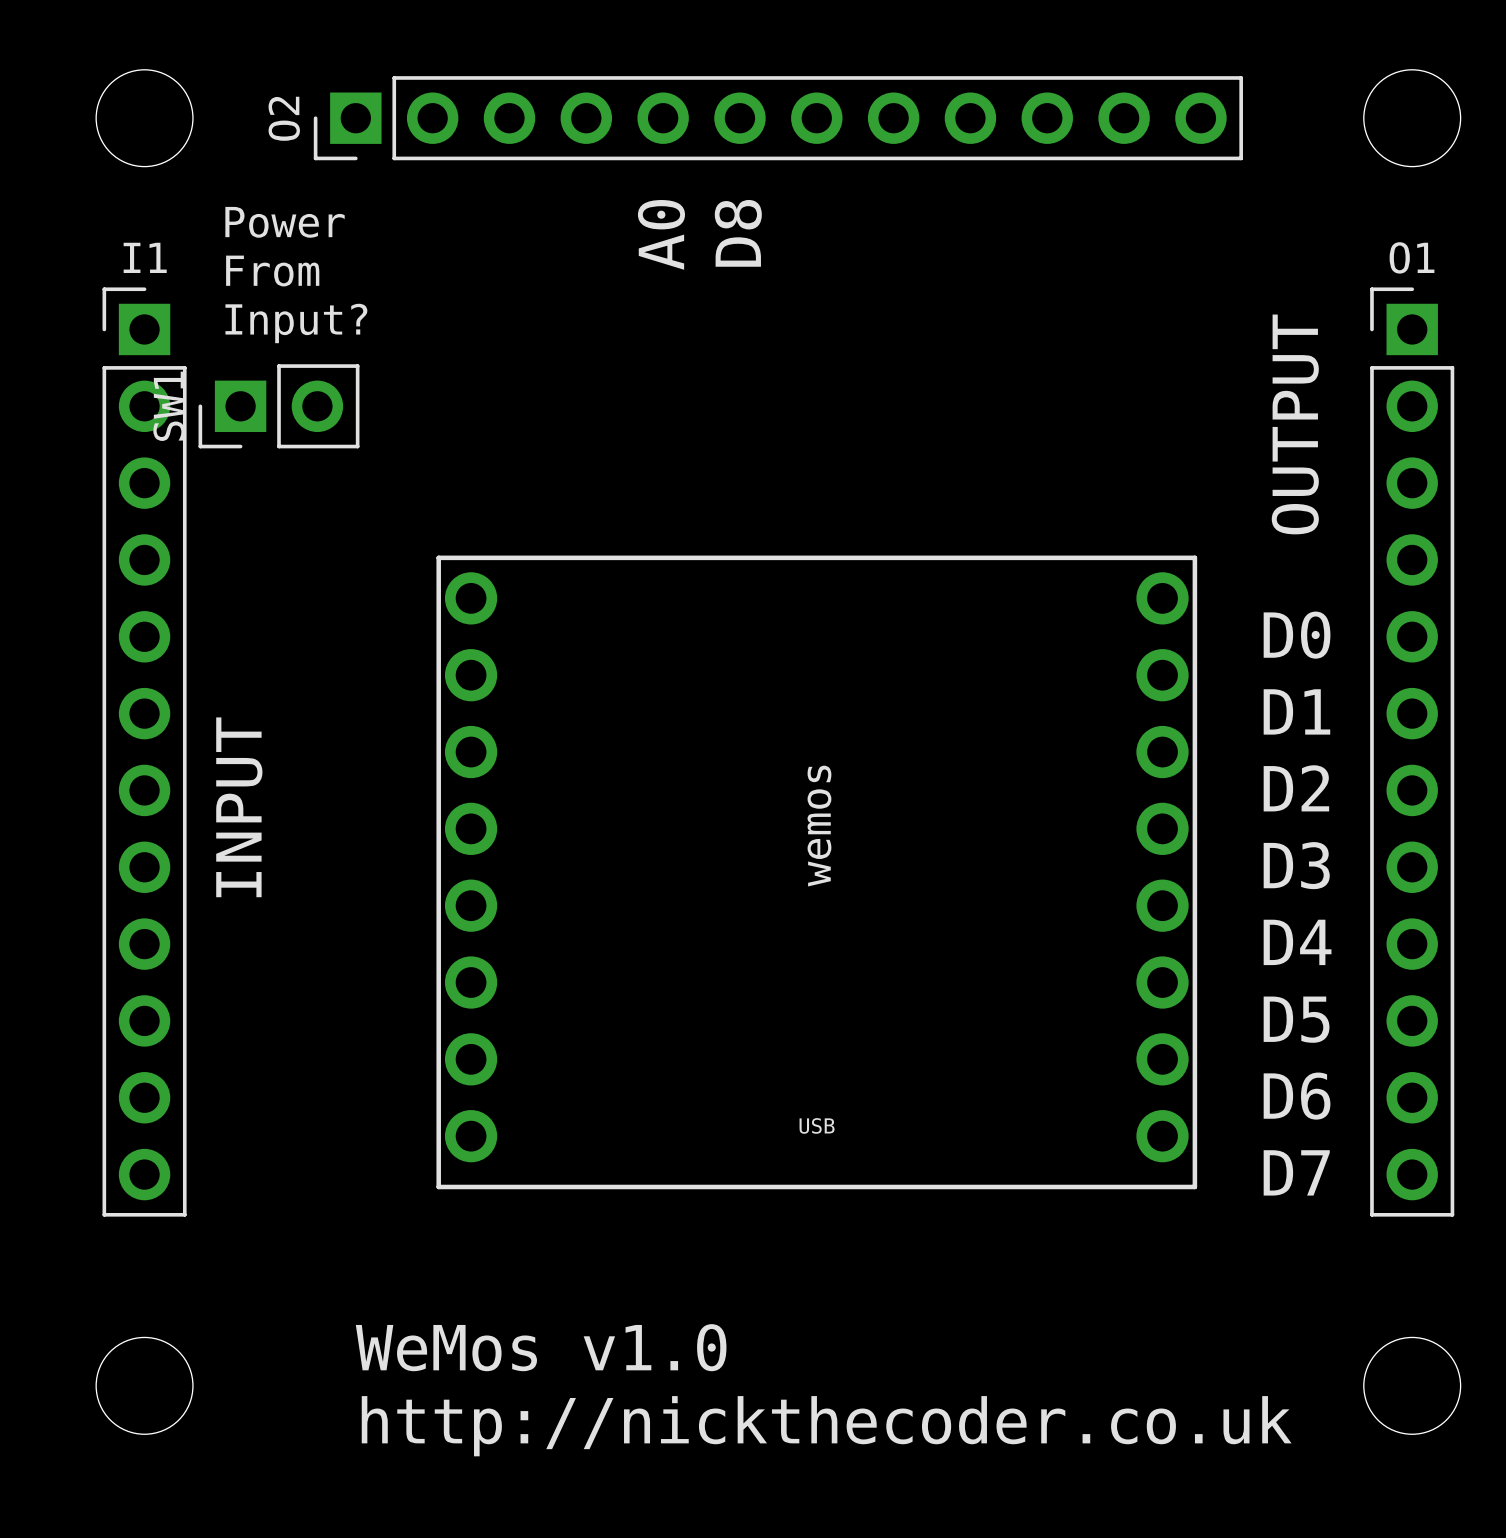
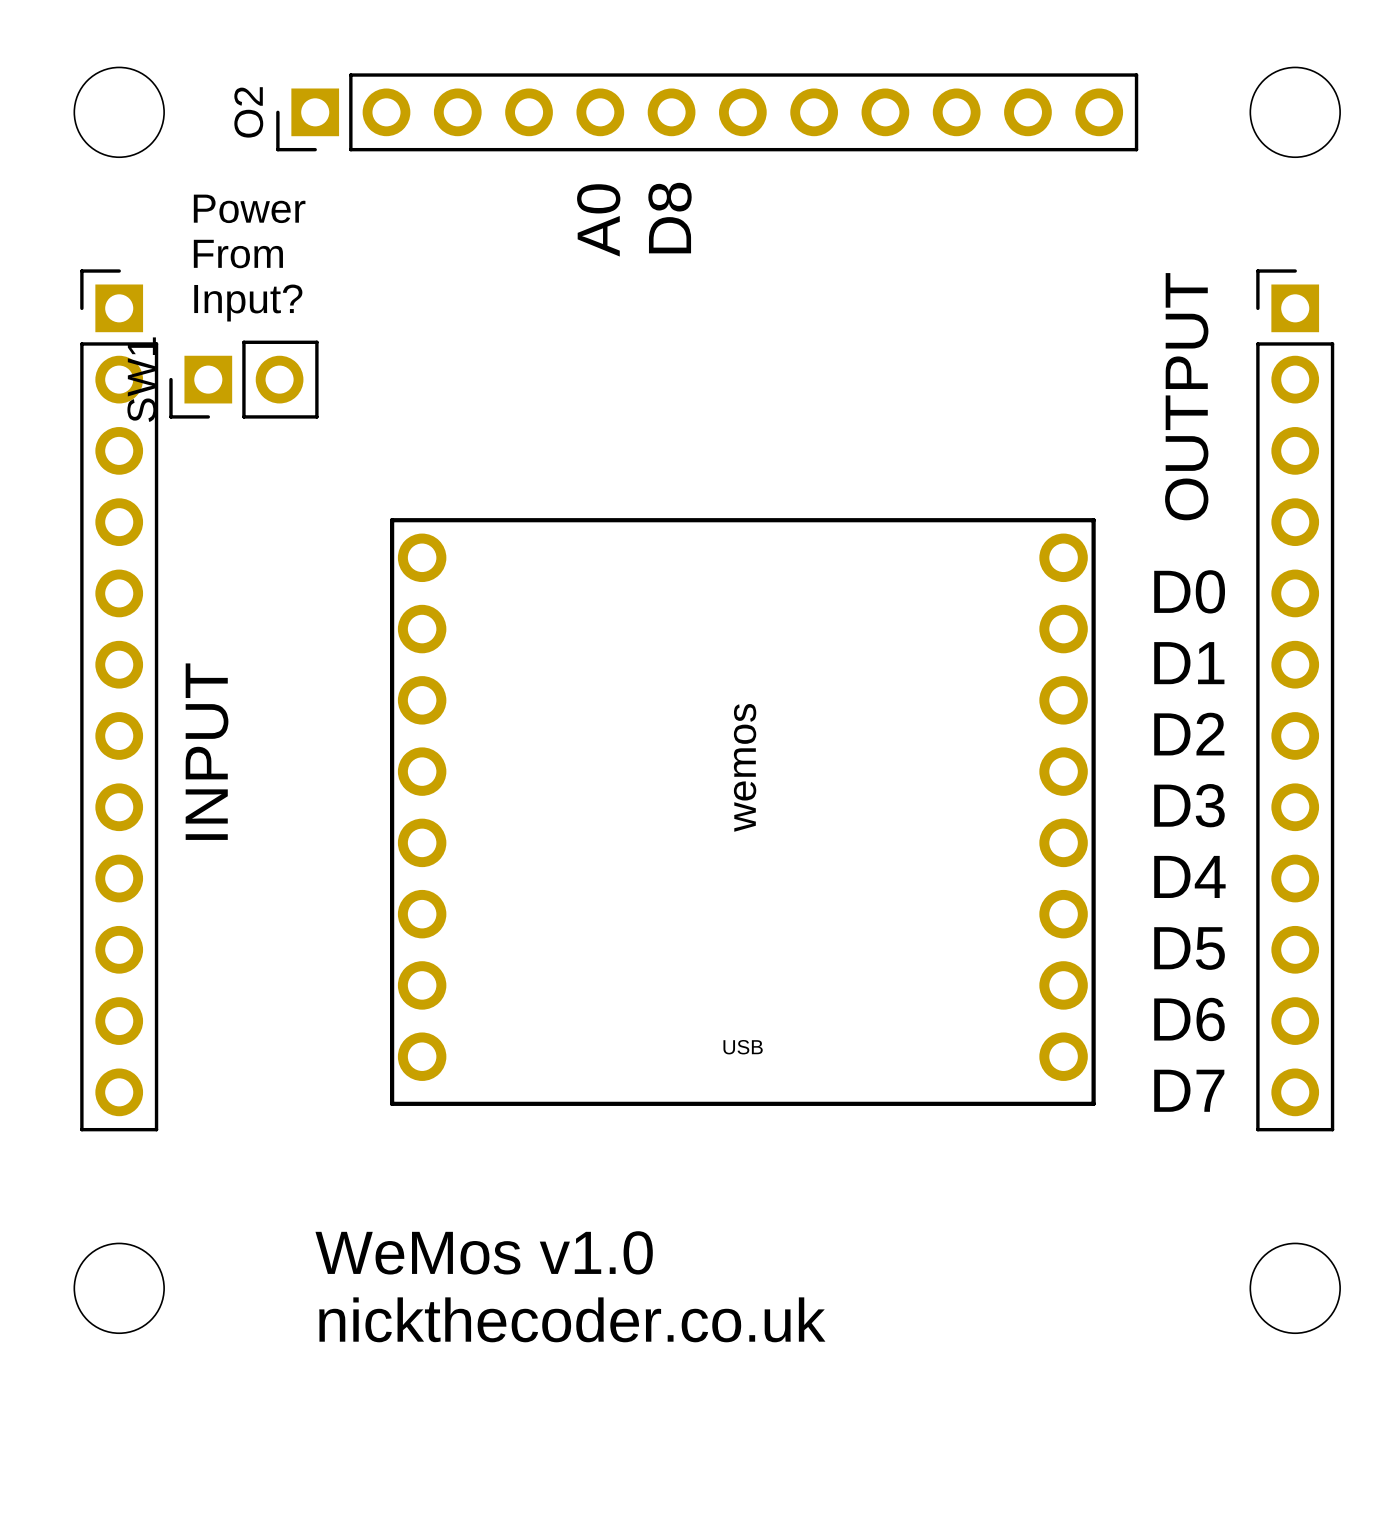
I1 name: I1 (145, 257) -> none
O1 name: O1 (1411, 257) -> none
text: http://nickthecoder.co.uk (826, 1426) -> nickthecoder.co.uk (572, 1319)

